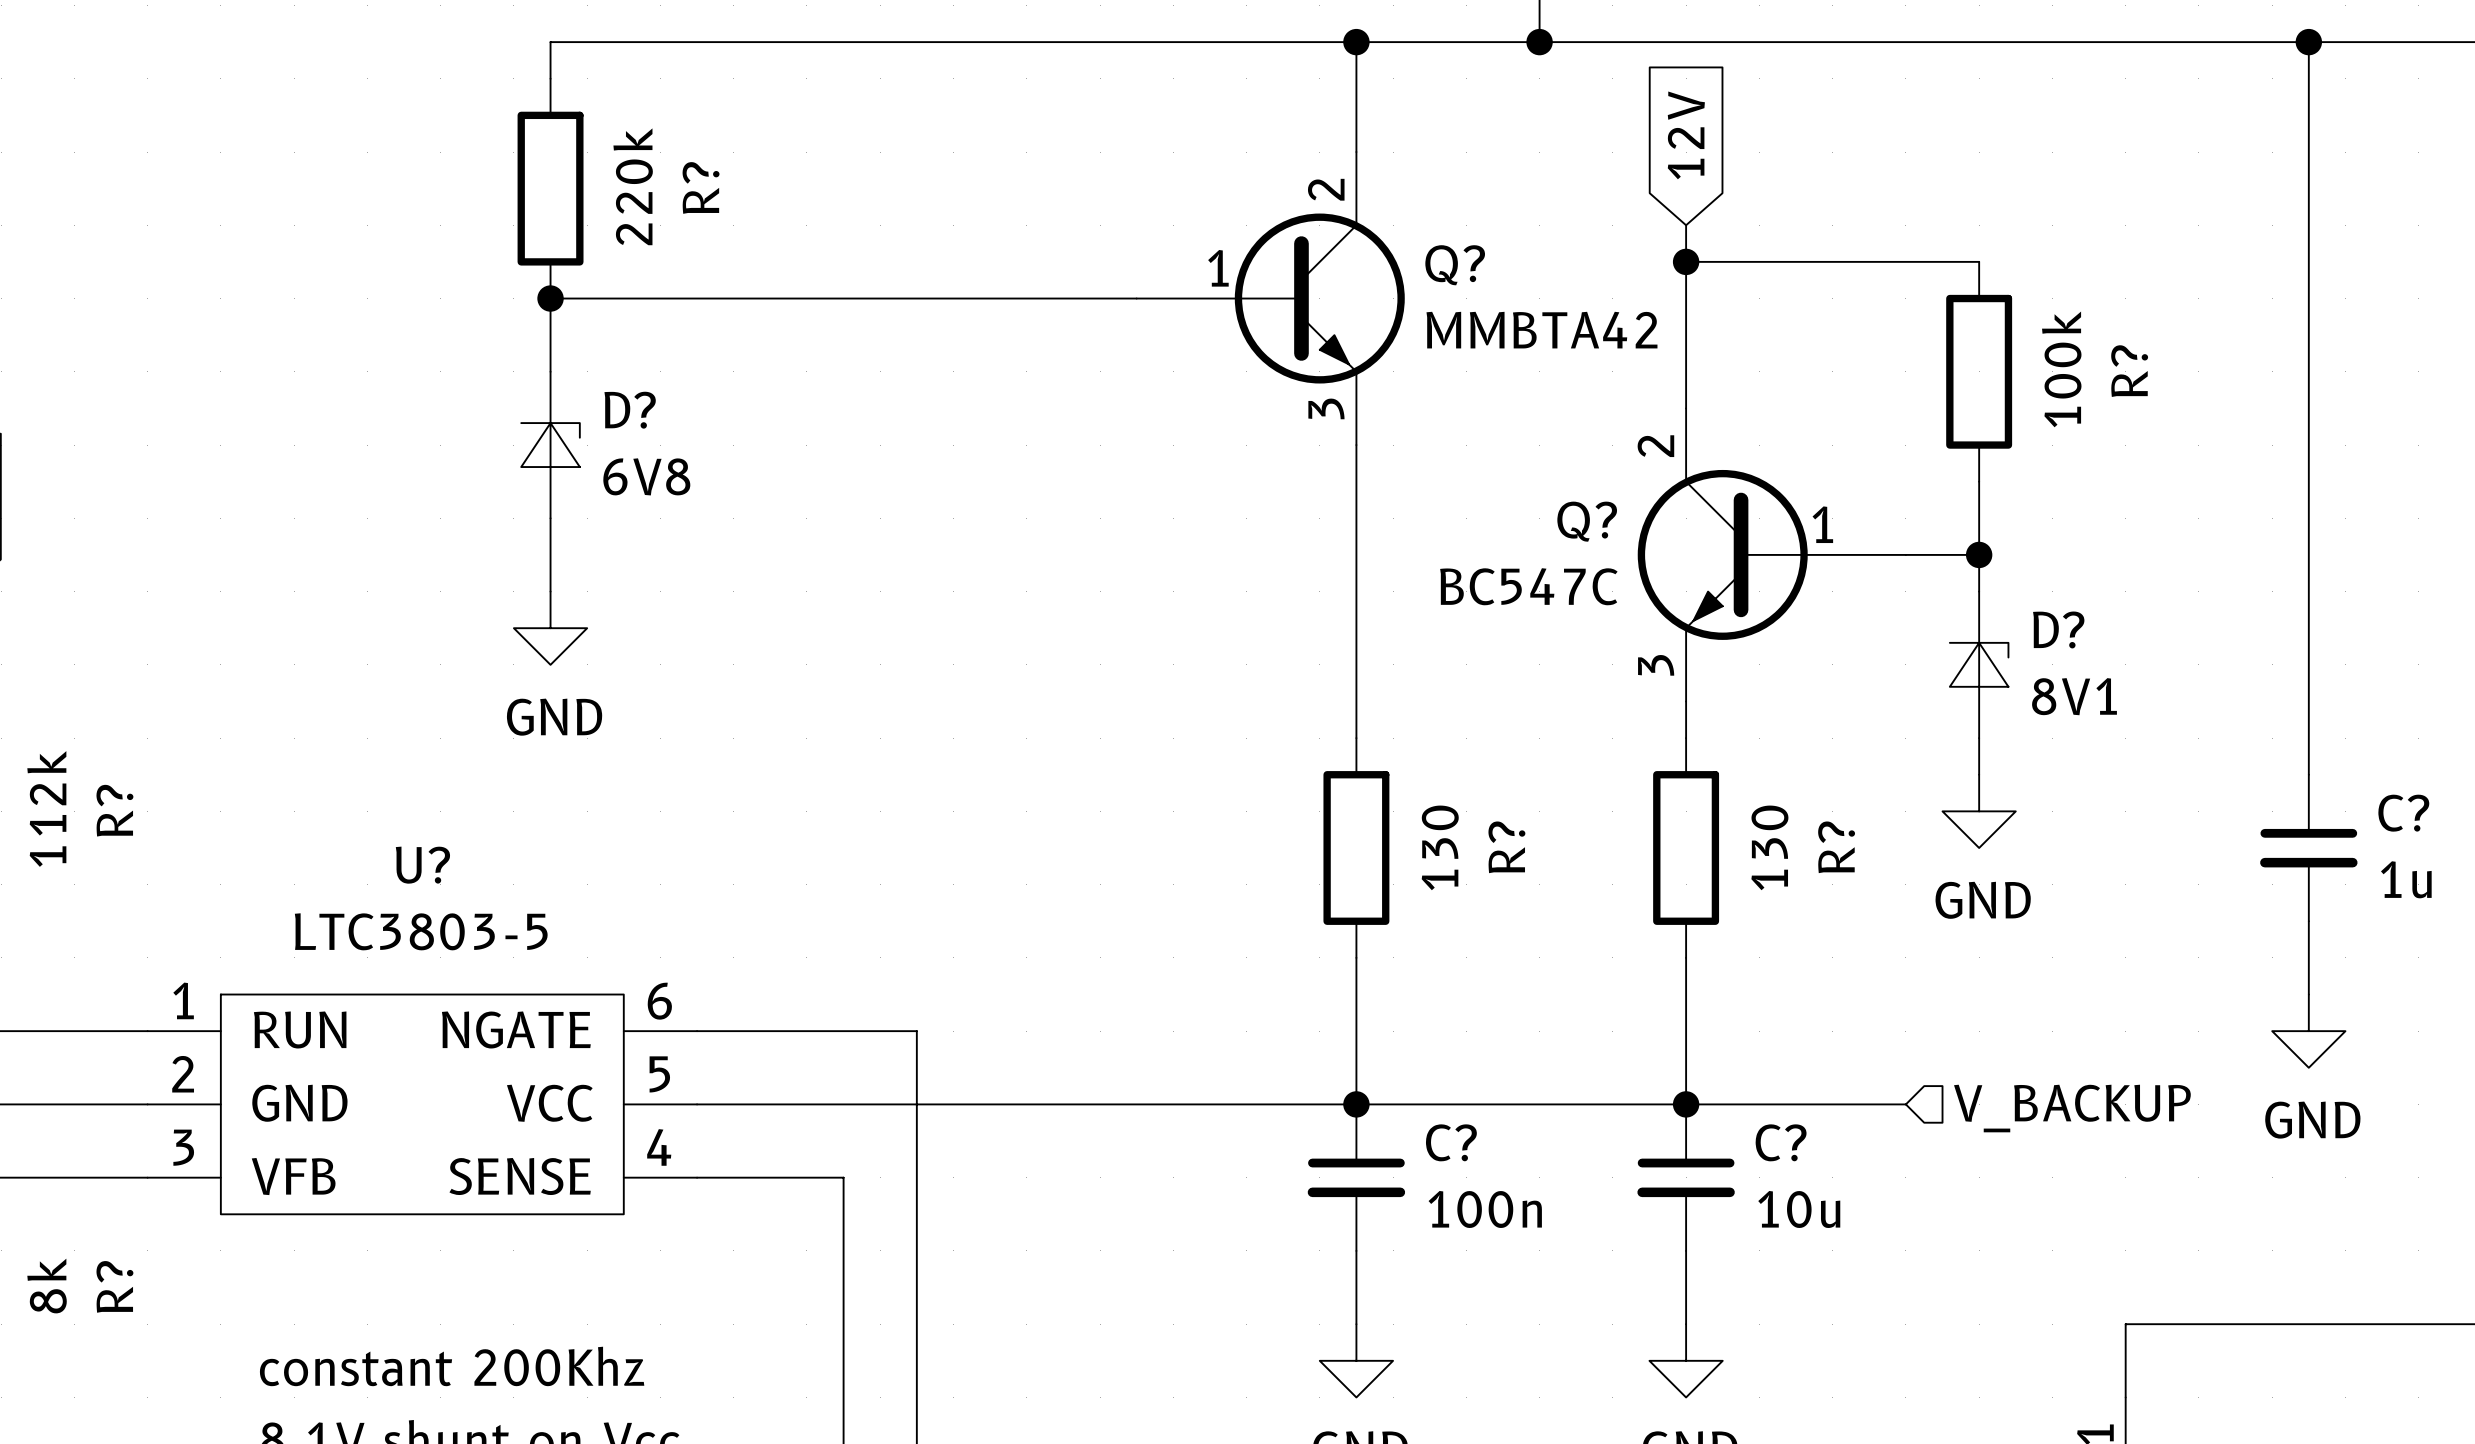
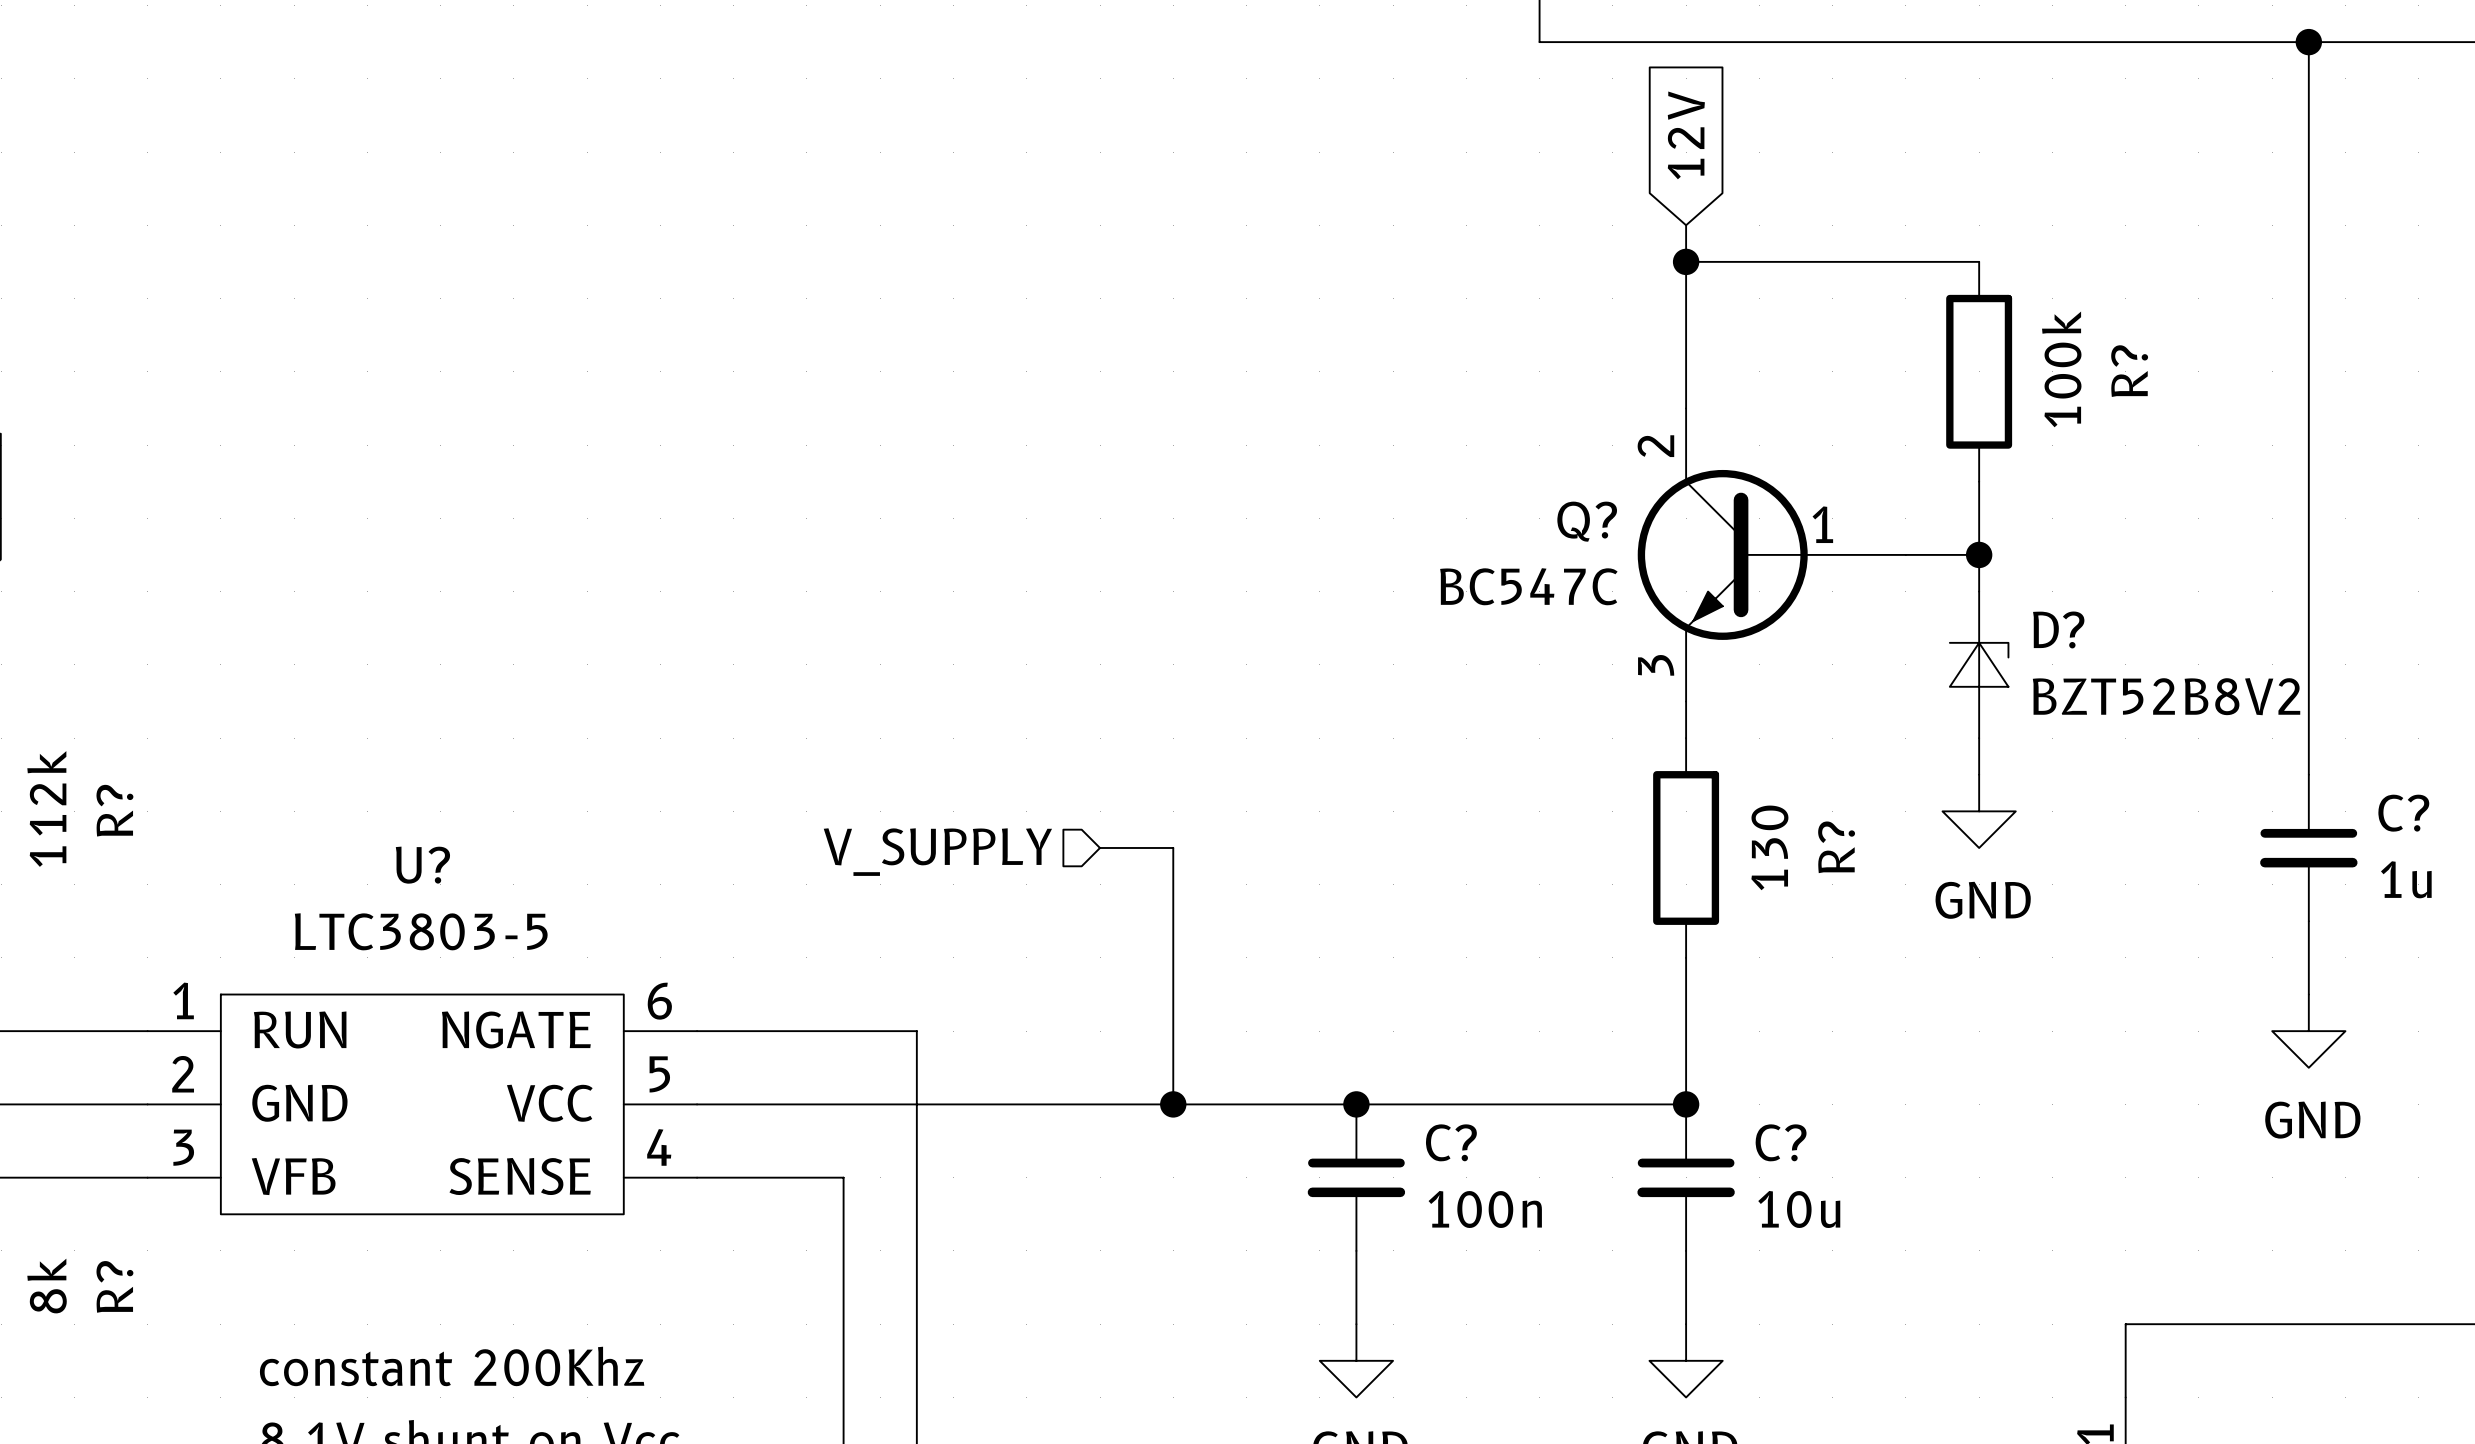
wire: (1356, 42) (1356, 152) -> none
junction: (1356, 42) -> none
wire: (1539, 42) (550, 42) (550, 78) -> none
junction: (1539, 42) -> none
R?: 220k (550, 188) -> none
junction: (550, 298) -> none
wire: (1136, 298) (550, 298) (550, 371) -> none
Q?: MMBTA42 (1270, 298) -> none
D?: 6V8 (550, 445) -> none
wire: (1356, 445) (1356, 738) -> none
wire: (550, 518) (550, 591) -> none
power symbol: GND (550, 628) -> none
D? value: 8V1 (2074, 696) -> BZT52B8V2 (2166, 696)
wire: none -> (1100, 847) (1173, 847) (1173, 1104)
R?: 130 (1356, 847) -> none
hierarchical label: none -> V_SUPPLY (937, 852)
wire: (1356, 957) (1356, 1104) -> none
junction: none -> (1173, 1104)
wire: (1686, 1104) (1905, 1104) -> none
hierarchical label: V_BACKUP (2072, 1108) -> none

